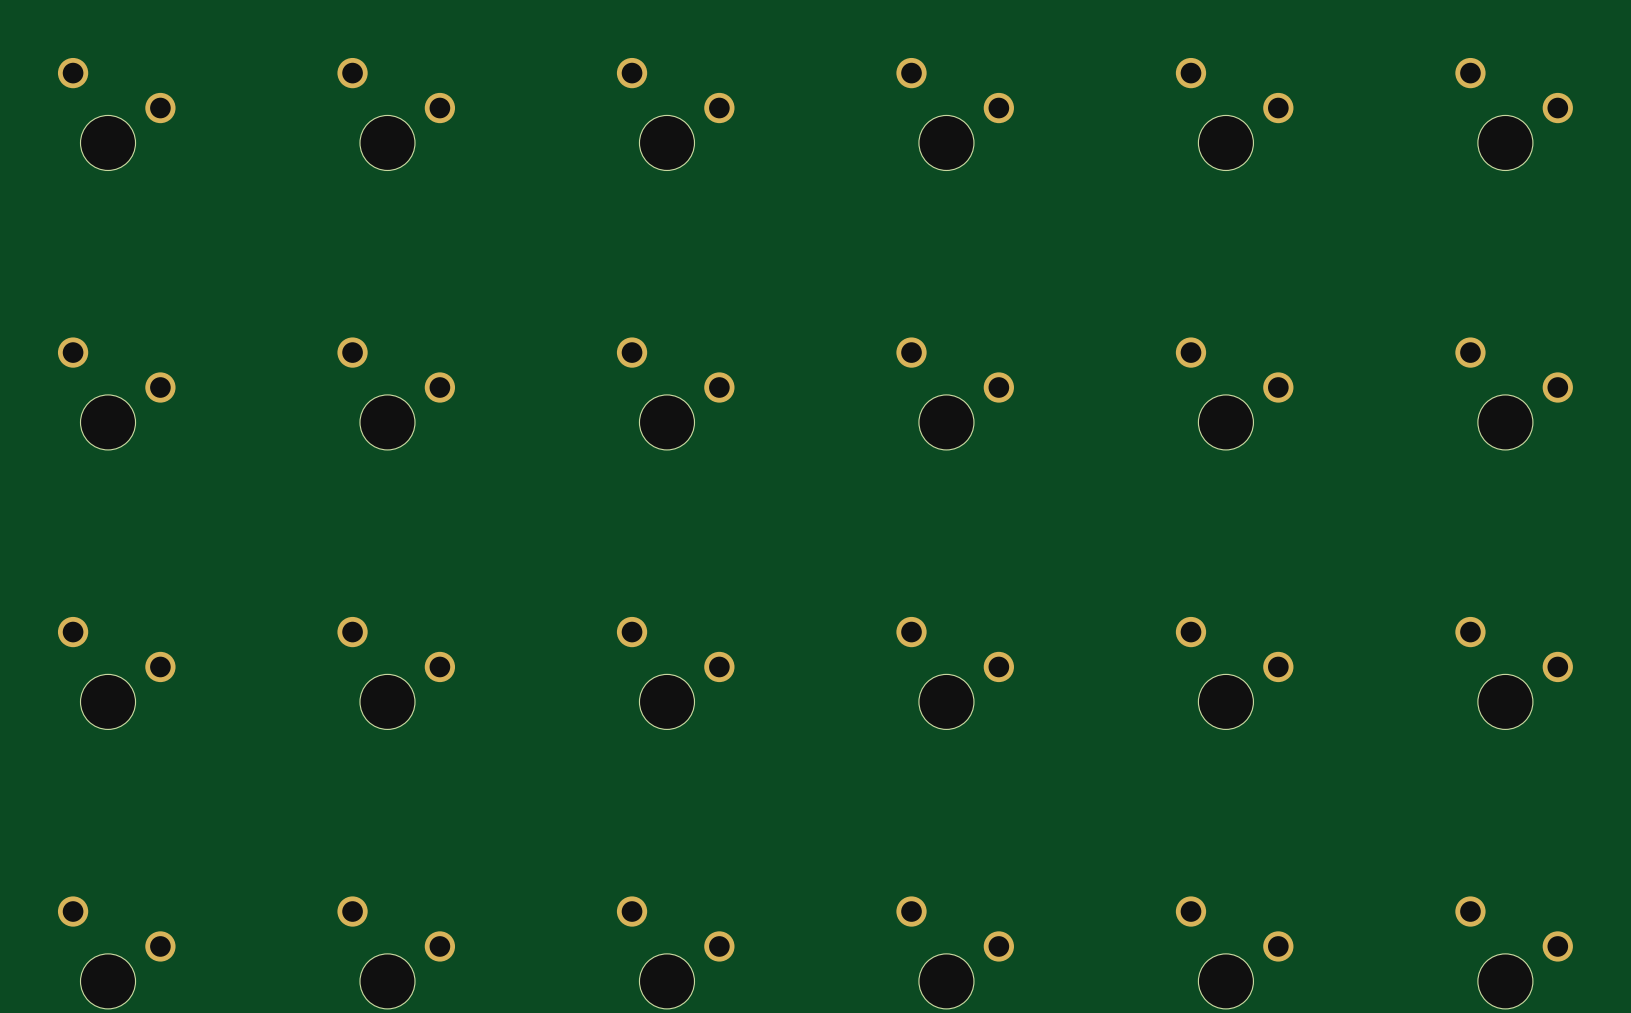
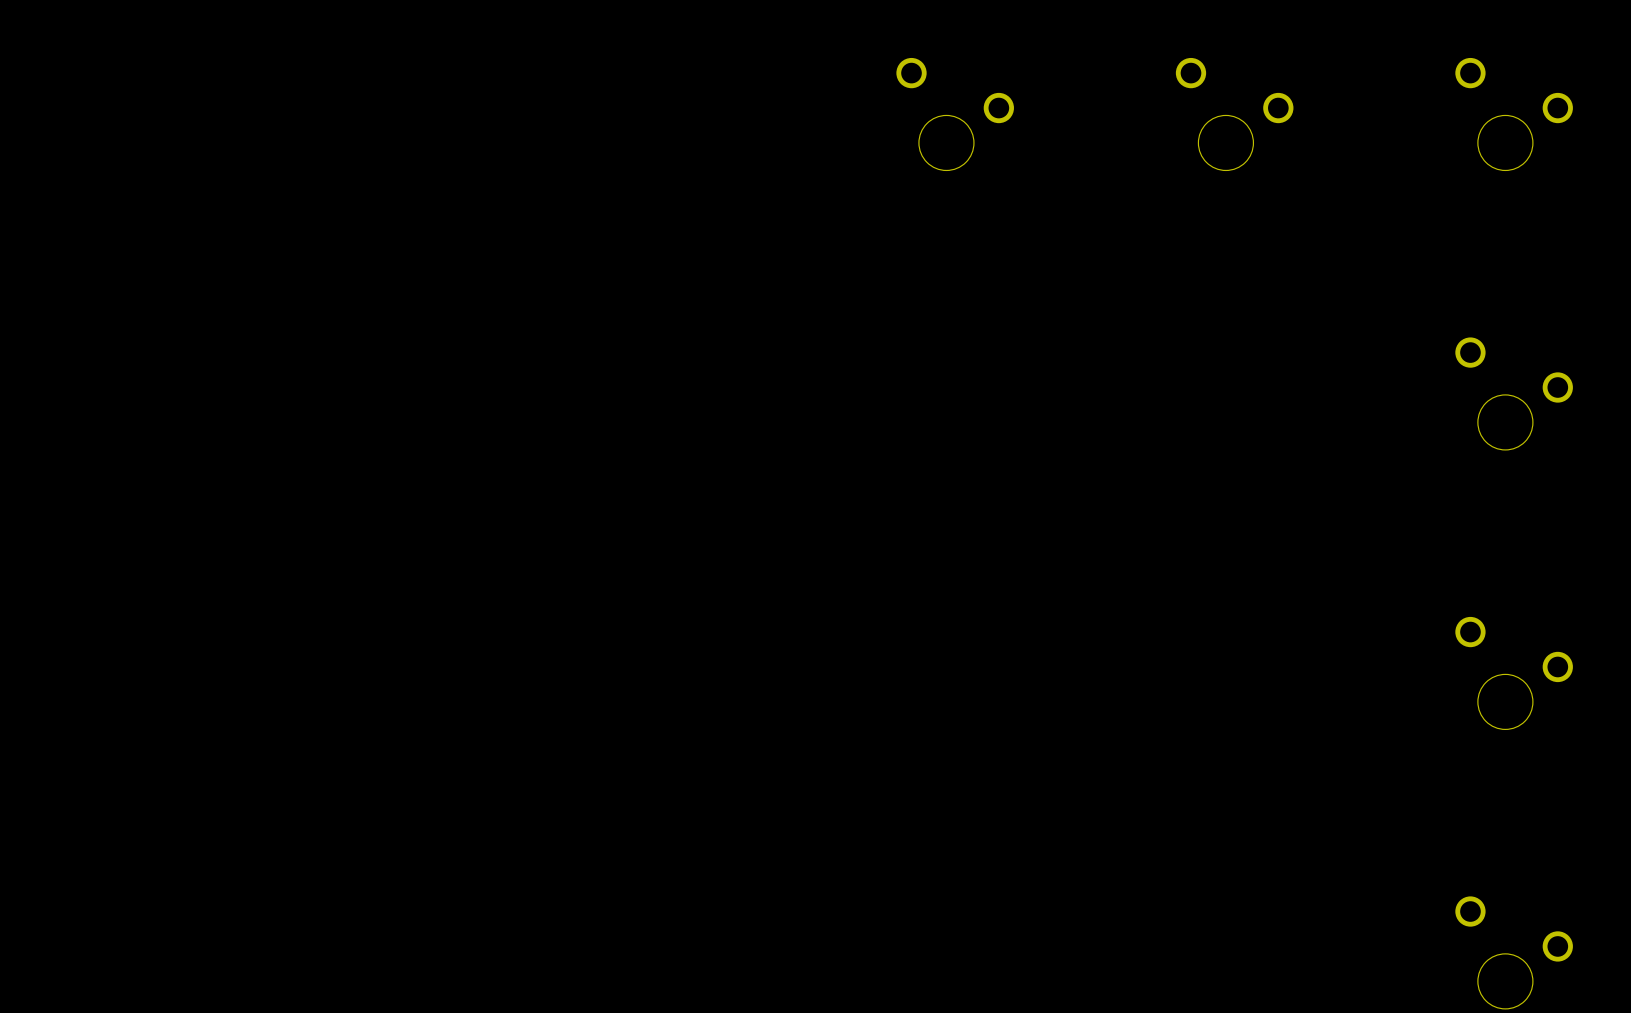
part: (116, 114) -> none
part: (396, 114) -> none
part: (675, 114) -> none
part: (116, 393) -> none
part: (396, 393) -> none
part: (675, 393) -> none
part: (955, 393) -> none
part: (1234, 393) -> none
part: (116, 673) -> none
part: (396, 673) -> none
part: (675, 673) -> none
part: (955, 673) -> none
part: (1234, 673) -> none
part: (116, 952) -> none
part: (396, 952) -> none
part: (675, 952) -> none
part: (955, 952) -> none
part: (1234, 952) -> none

